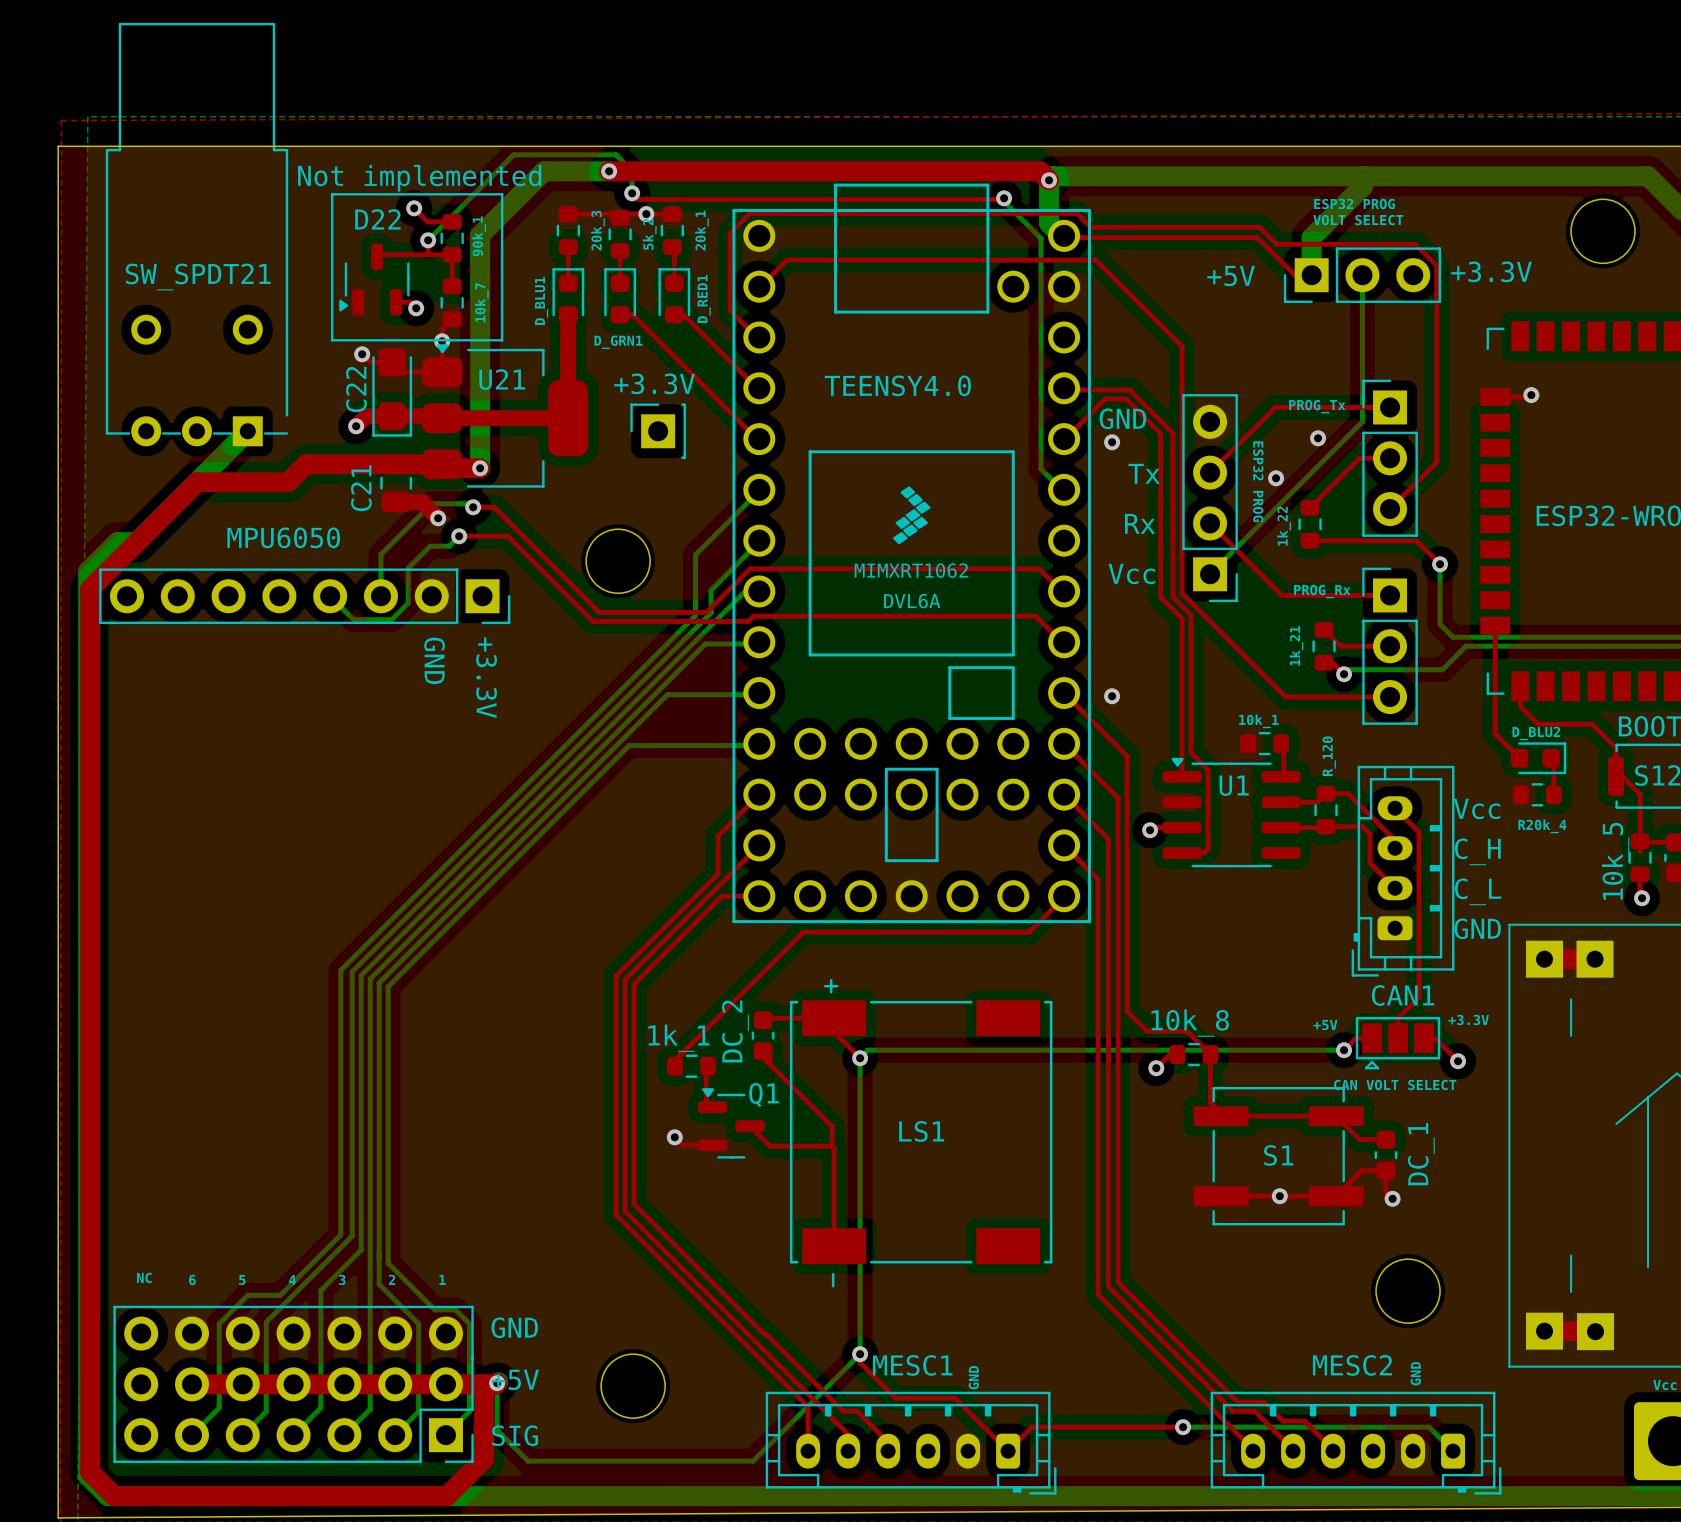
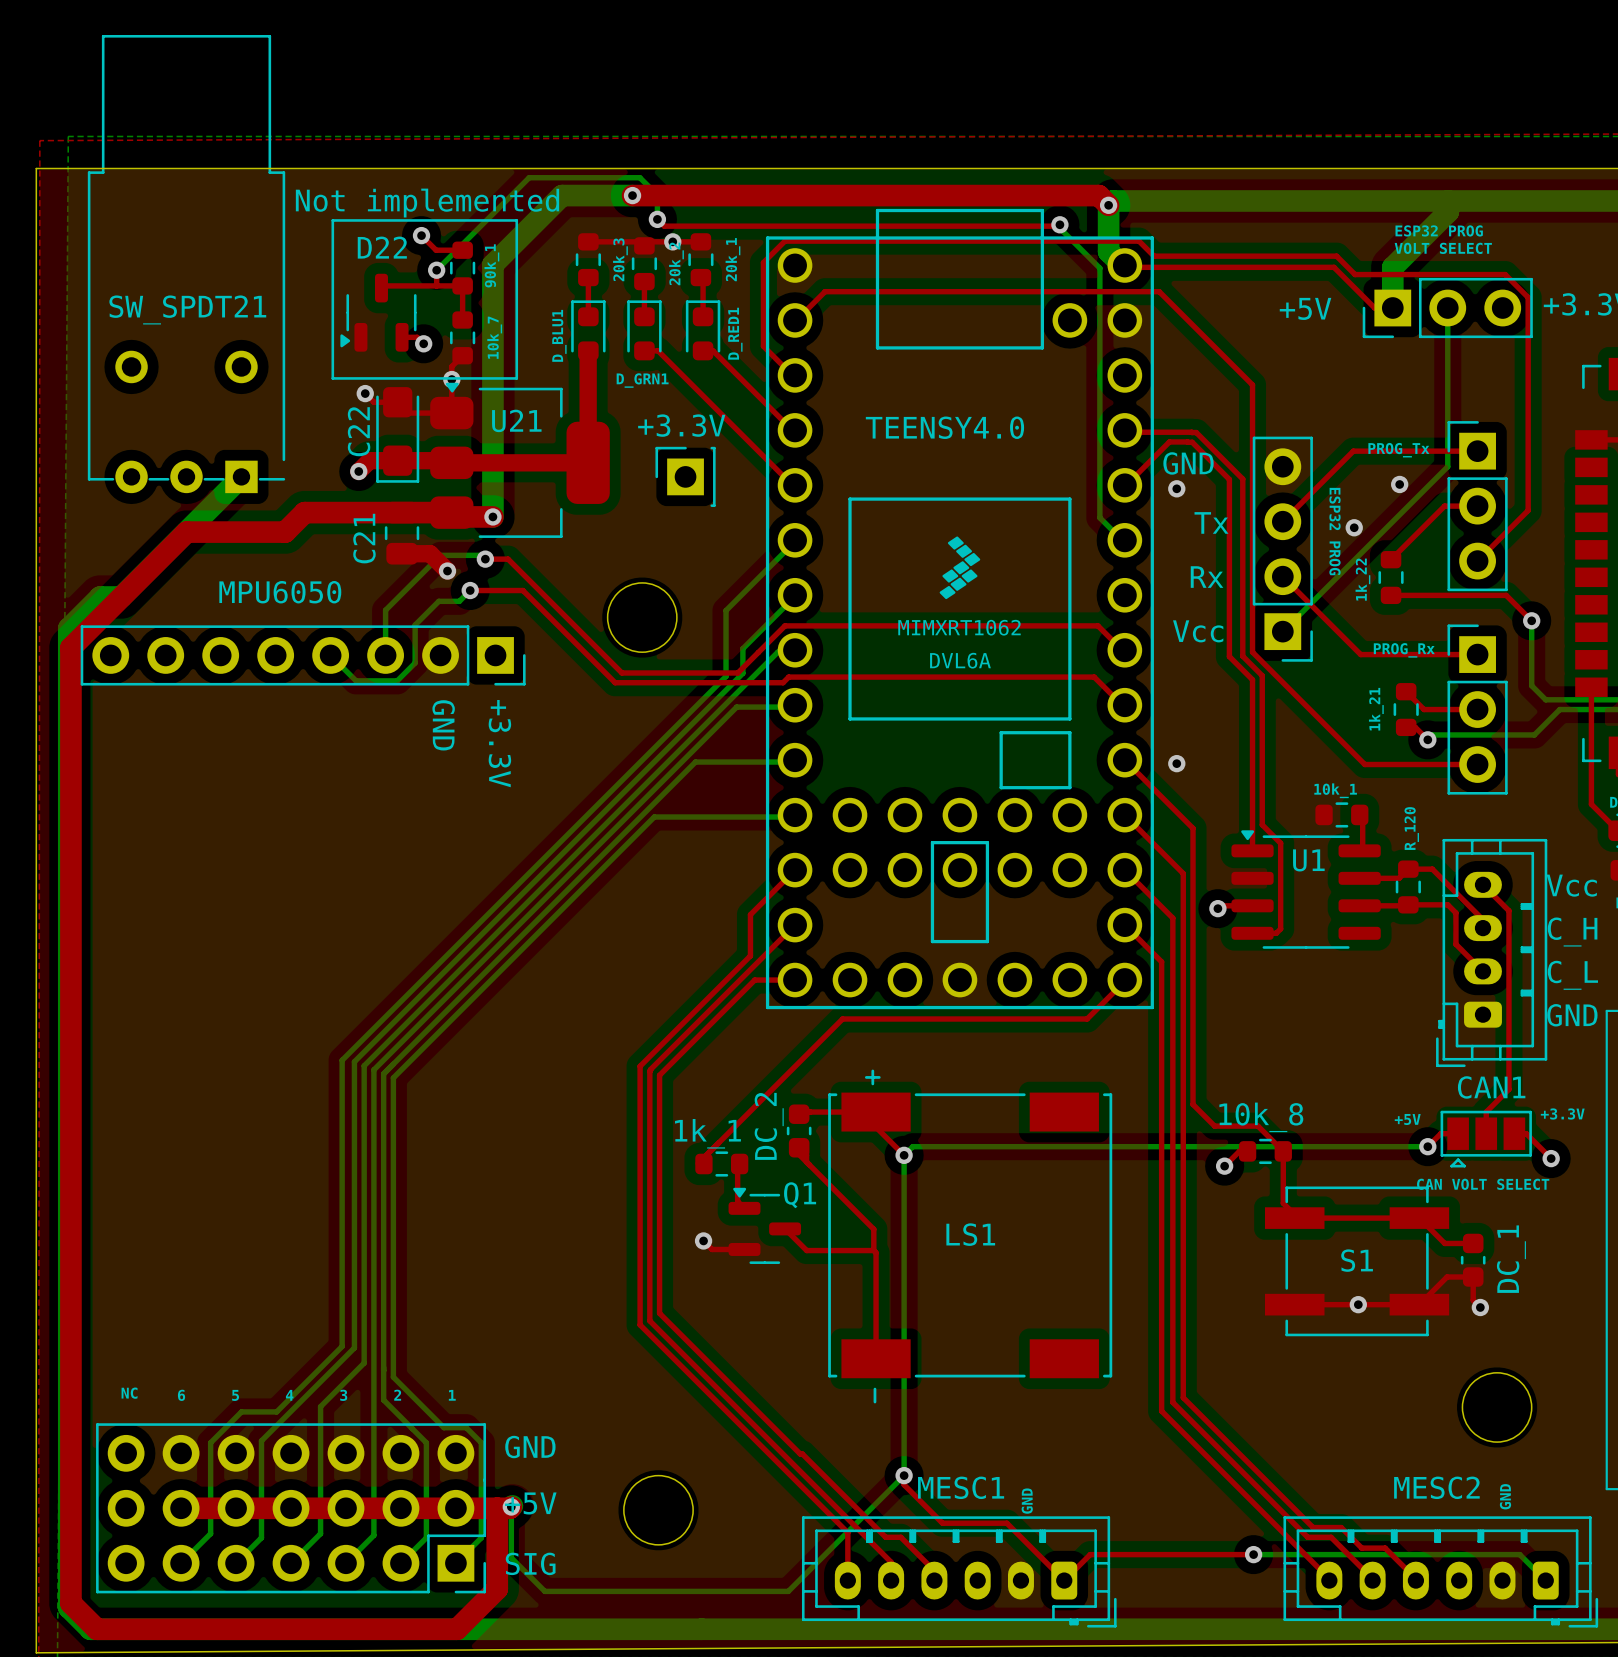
5k_2 name: 5k_2 (649, 234) -> 20k_2 (676, 263)

